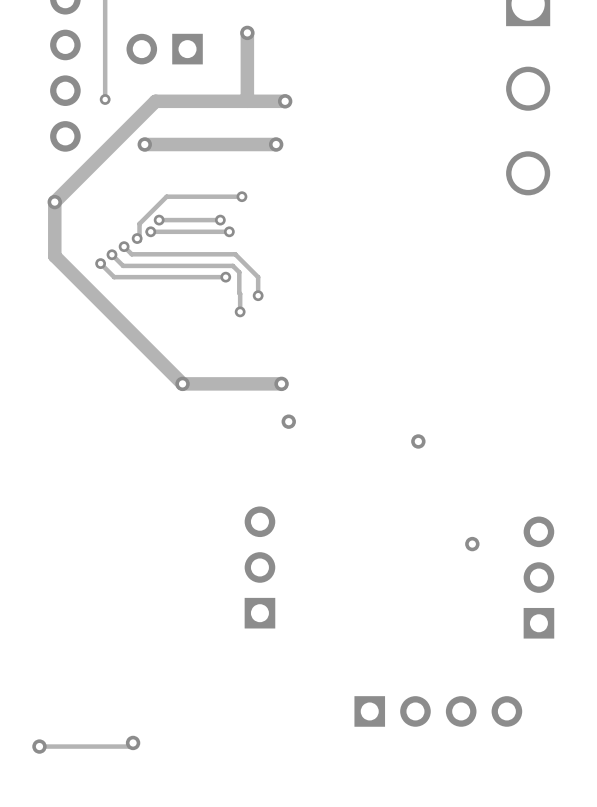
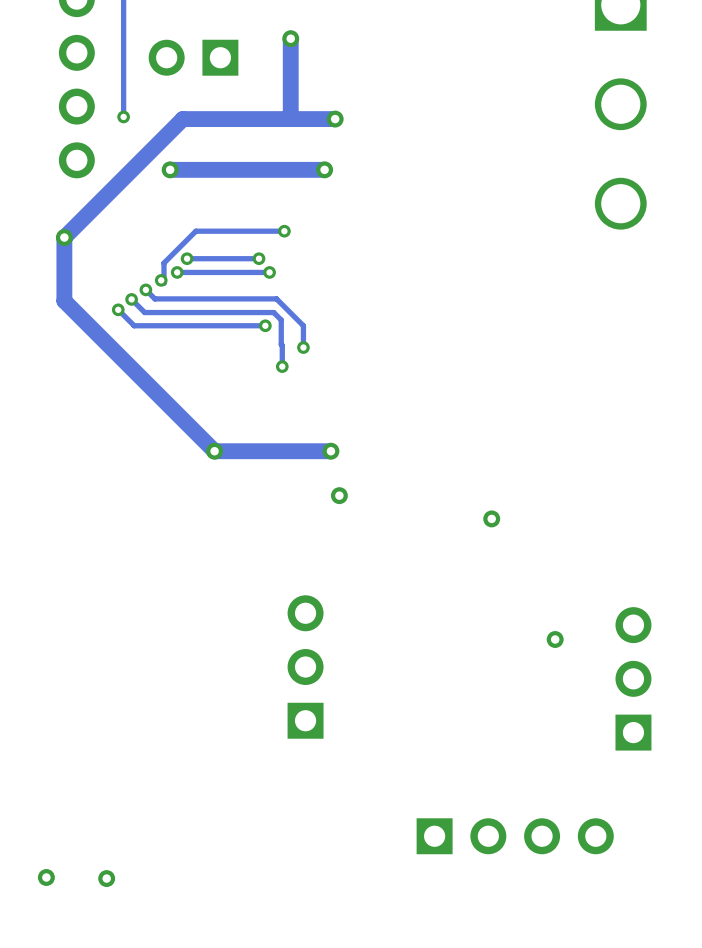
track: (133, 742) (129, 746) (39, 746) -> none
via position: (133, 742) -> (106, 878)

